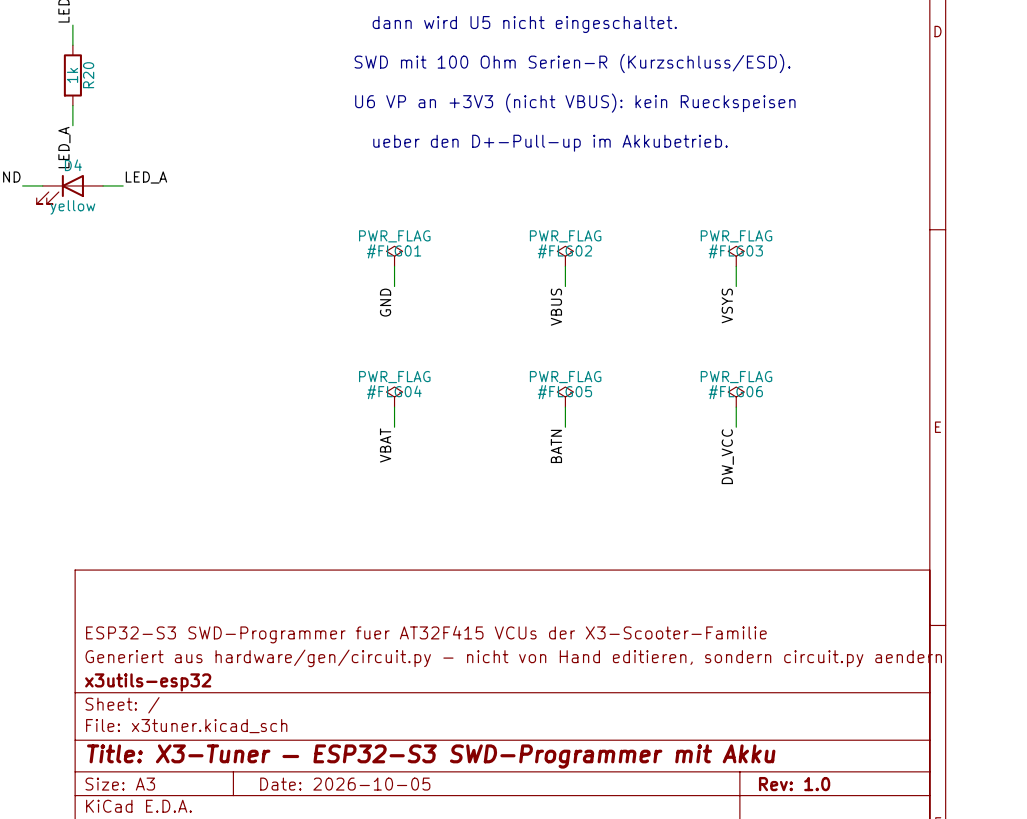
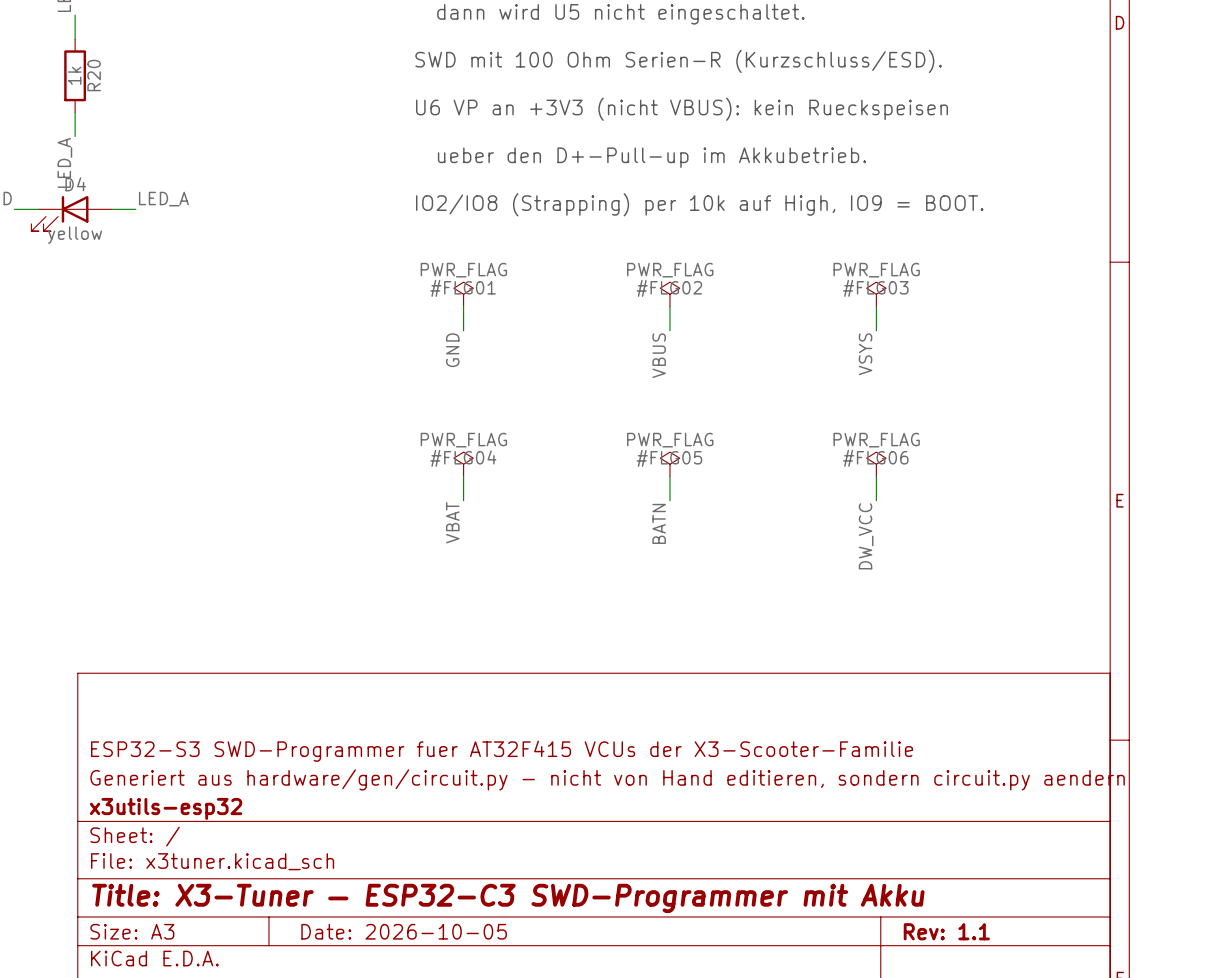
text: none -> IO2/IO8 (Strapping) per 10k auf High, IO9 = BOOT. (699, 204)
title block: Title: X3-Tuner — ESP32-S3 SWD-Programmer mit Akku (431, 756) -> Title: X3-Tuner — ESP32-C3 SWD-Programmer mit Akku (508, 898)
title block: Rev: 1.0 (794, 784) -> Rev: 1.1 (946, 931)

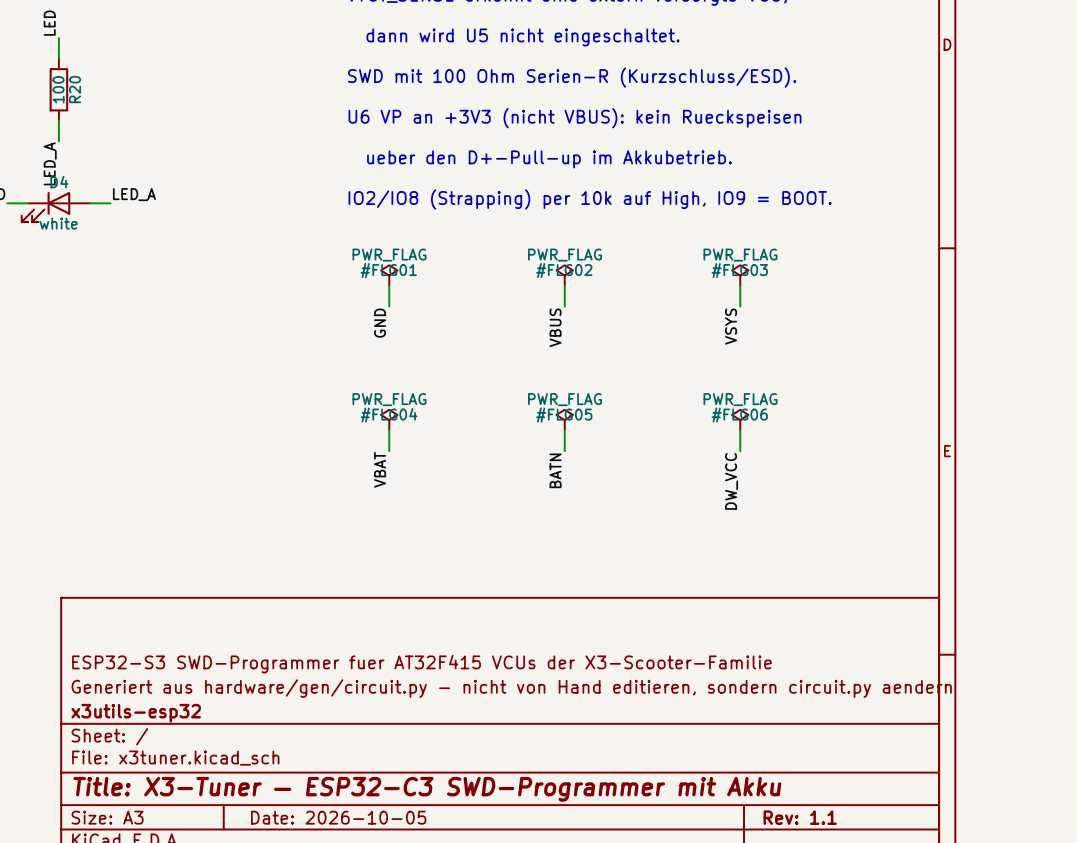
R20 value: 1k (74, 75) -> 100 (58, 89)
D4 value: yellow (75, 235) -> white (58, 223)

